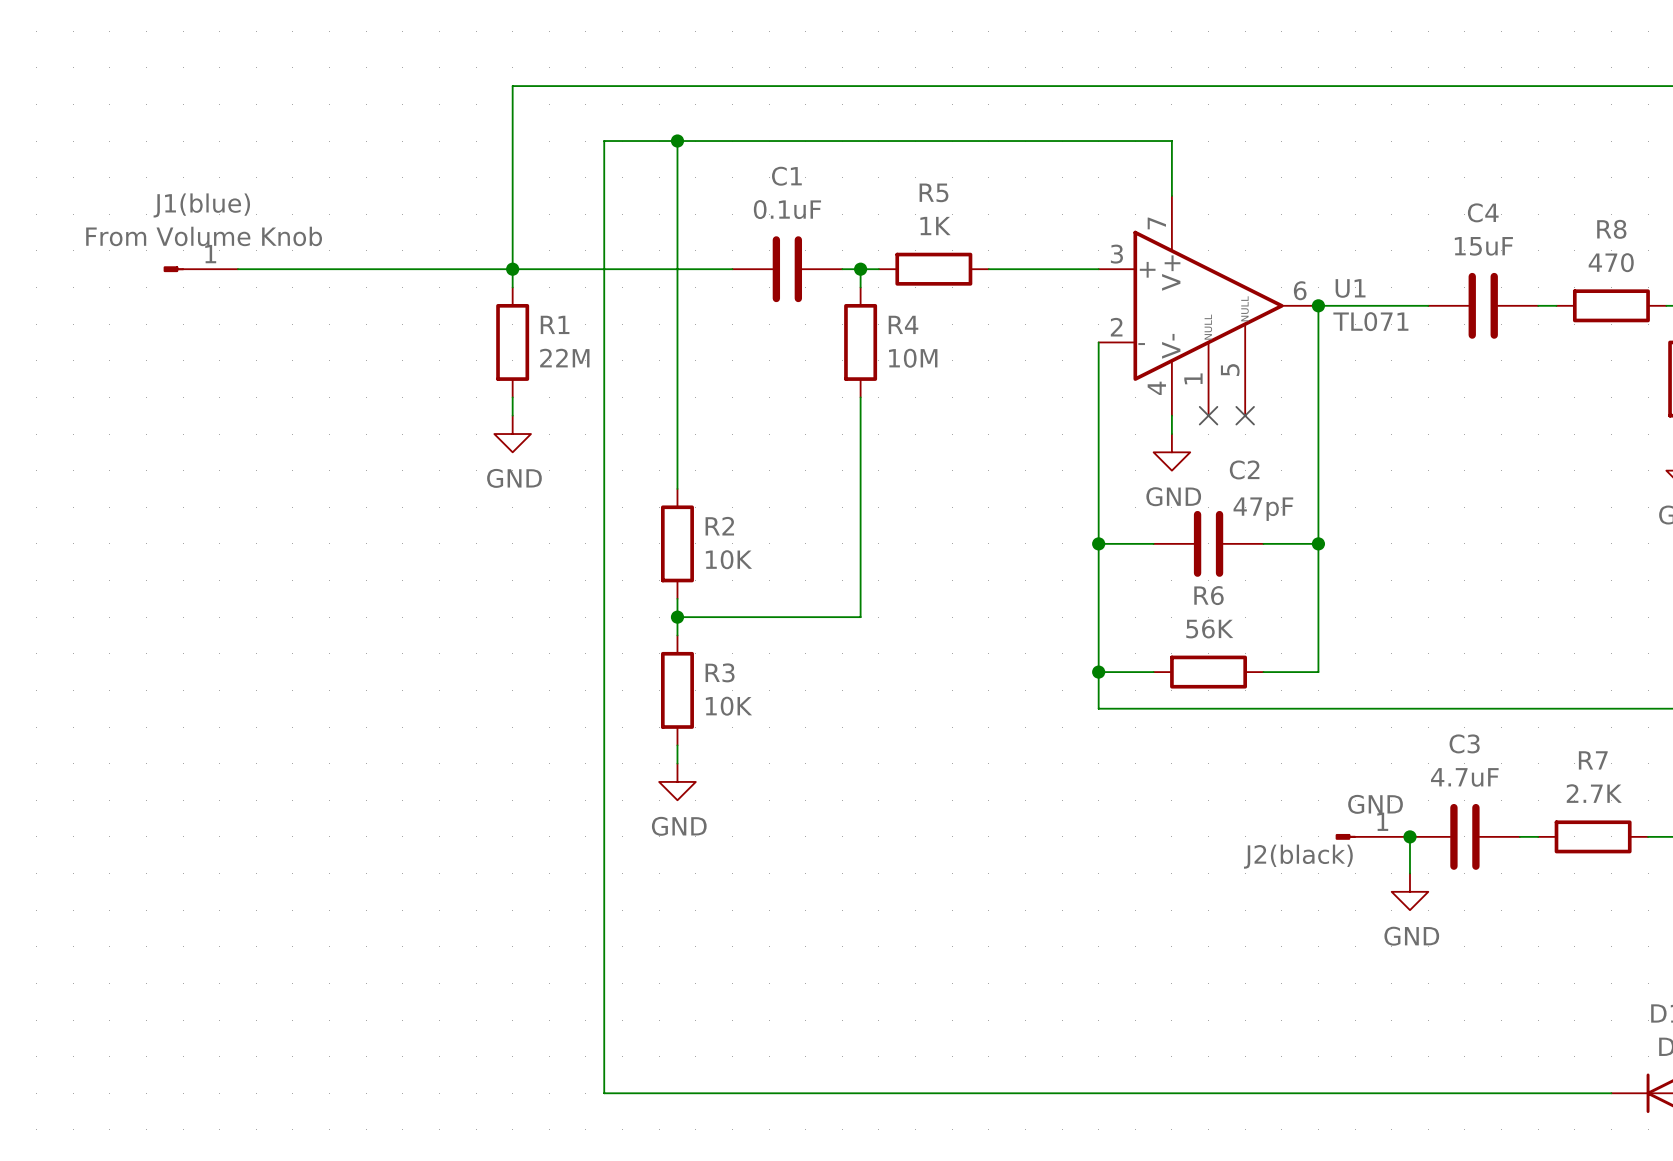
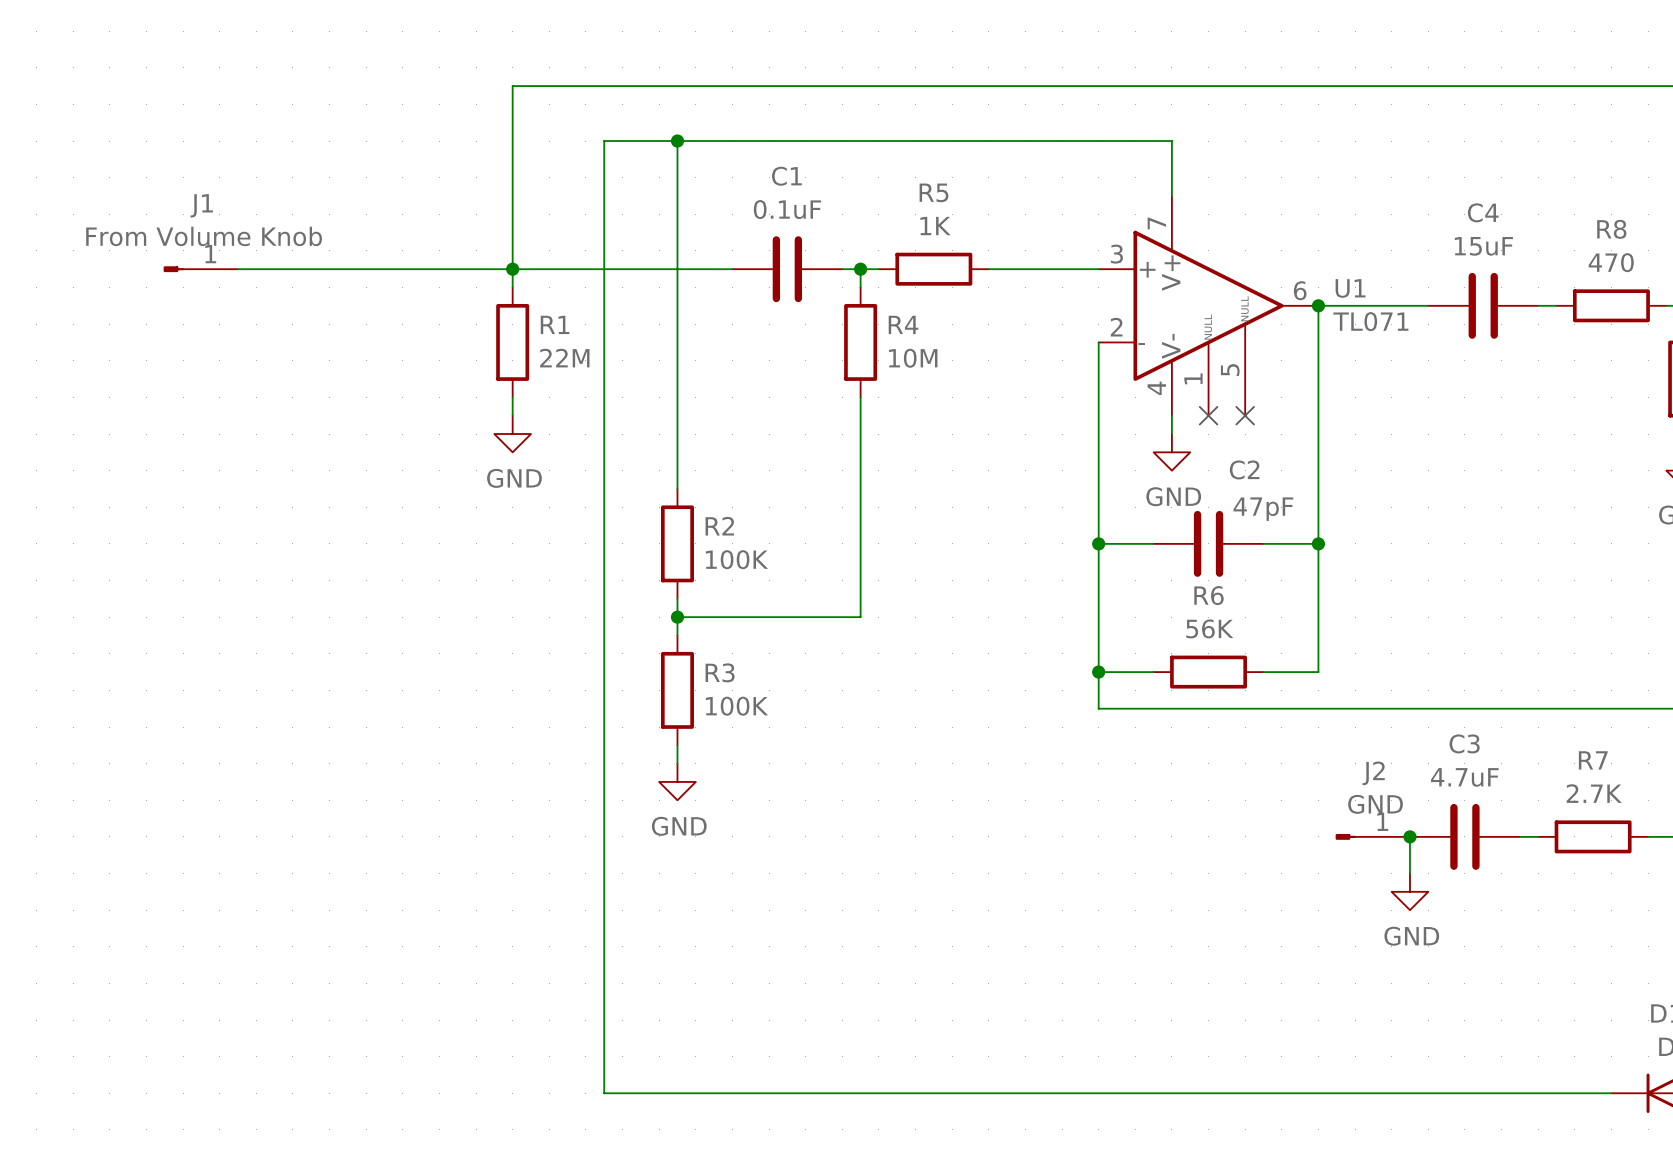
J1(blue) name: J1(blue) (201, 205) -> J1 (201, 205)
R2 value: 10K (728, 559) -> 100K (736, 559)
R3 value: 10K (728, 706) -> 100K (736, 706)
J2(black) name: J2(black) (1298, 856) -> J2 (1373, 773)

